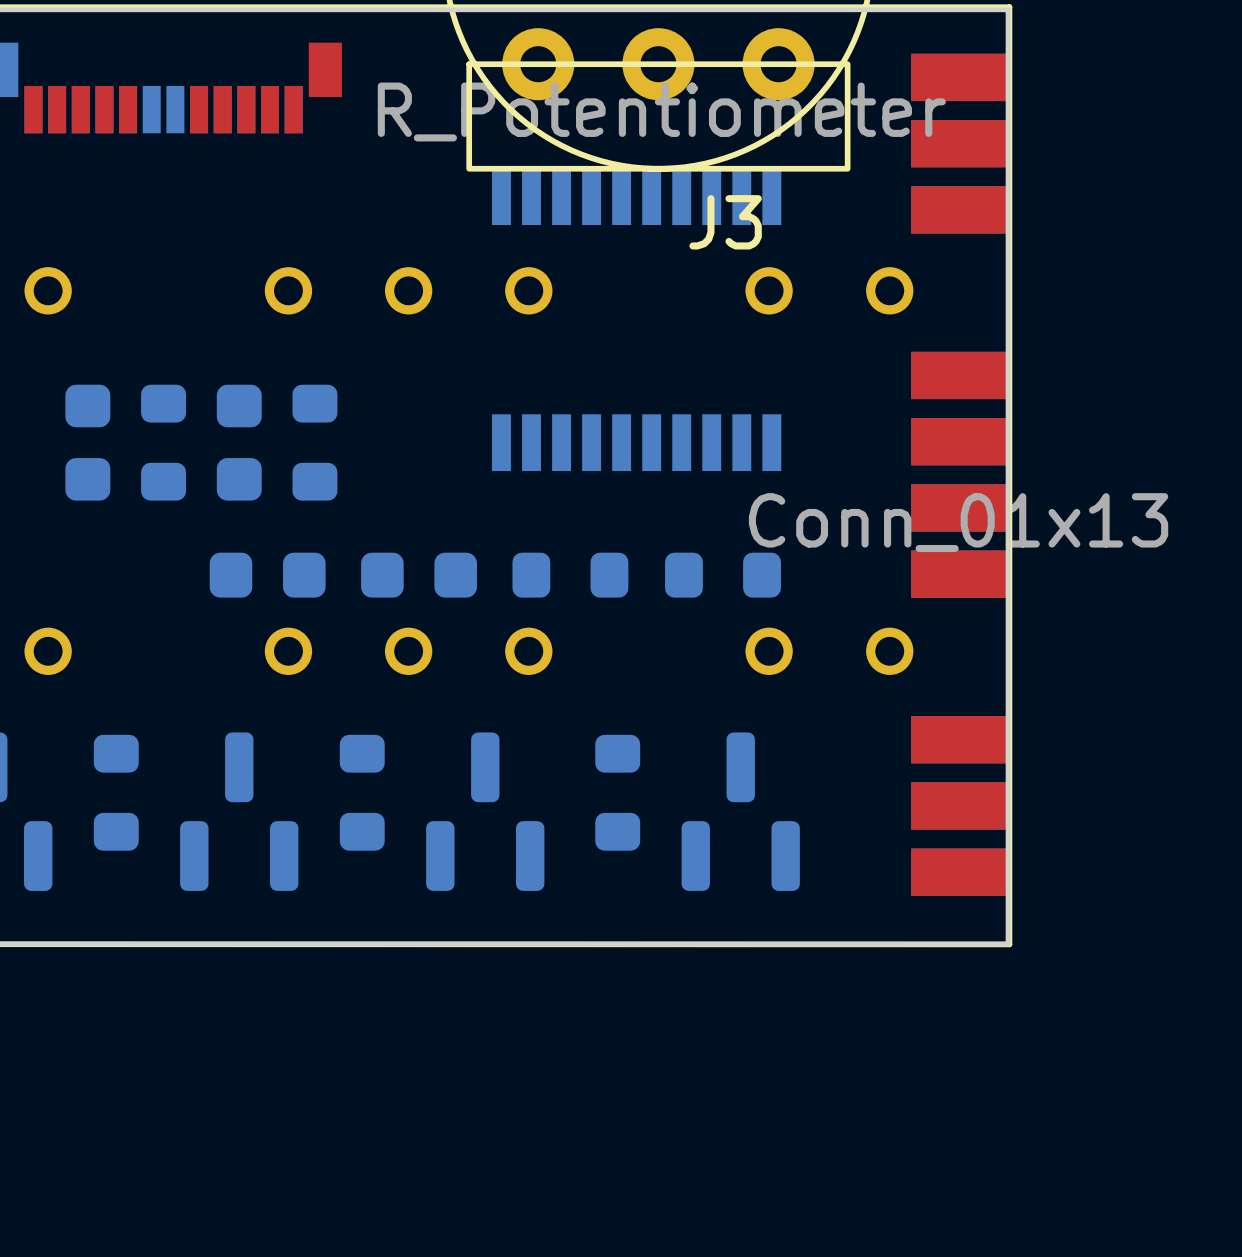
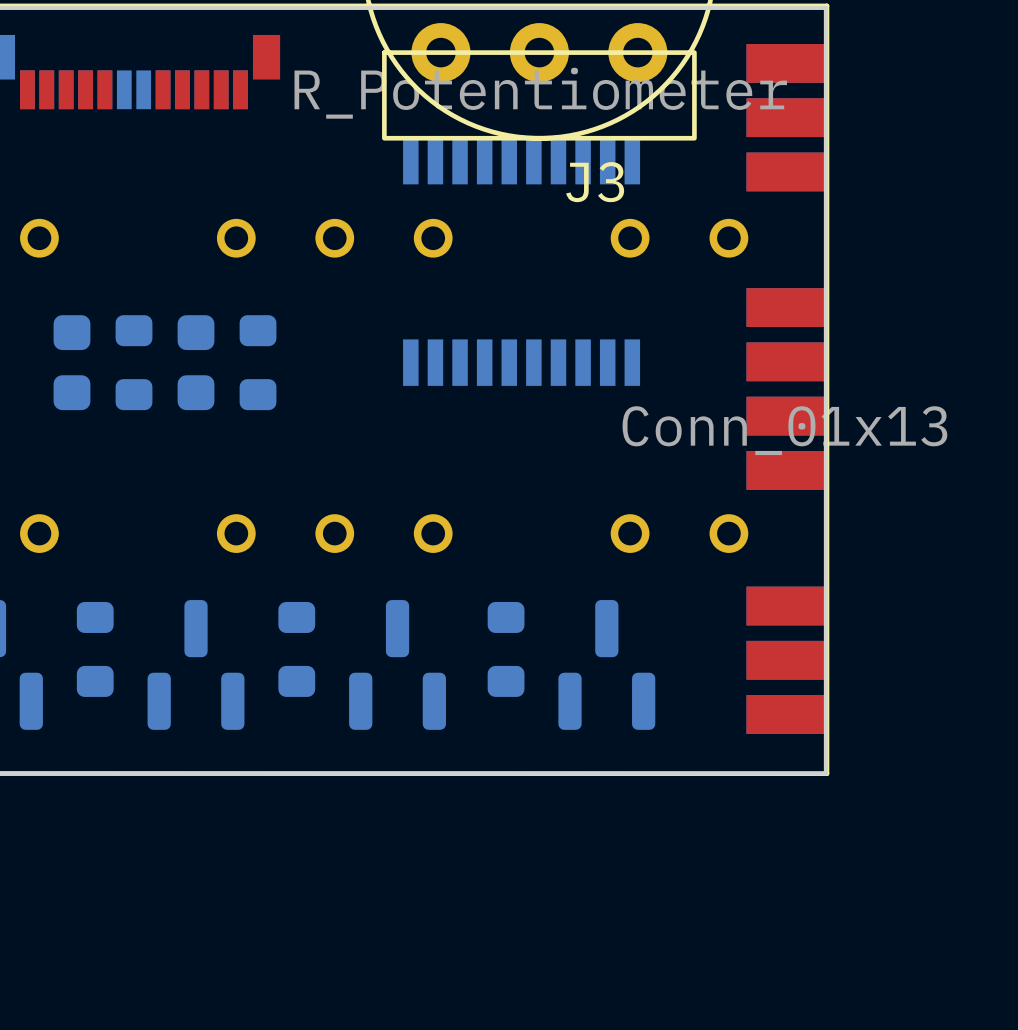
part: (267, 575) -> none
part: (419, 575) -> none
part: (570, 575) -> none
part: (722, 575) -> none

